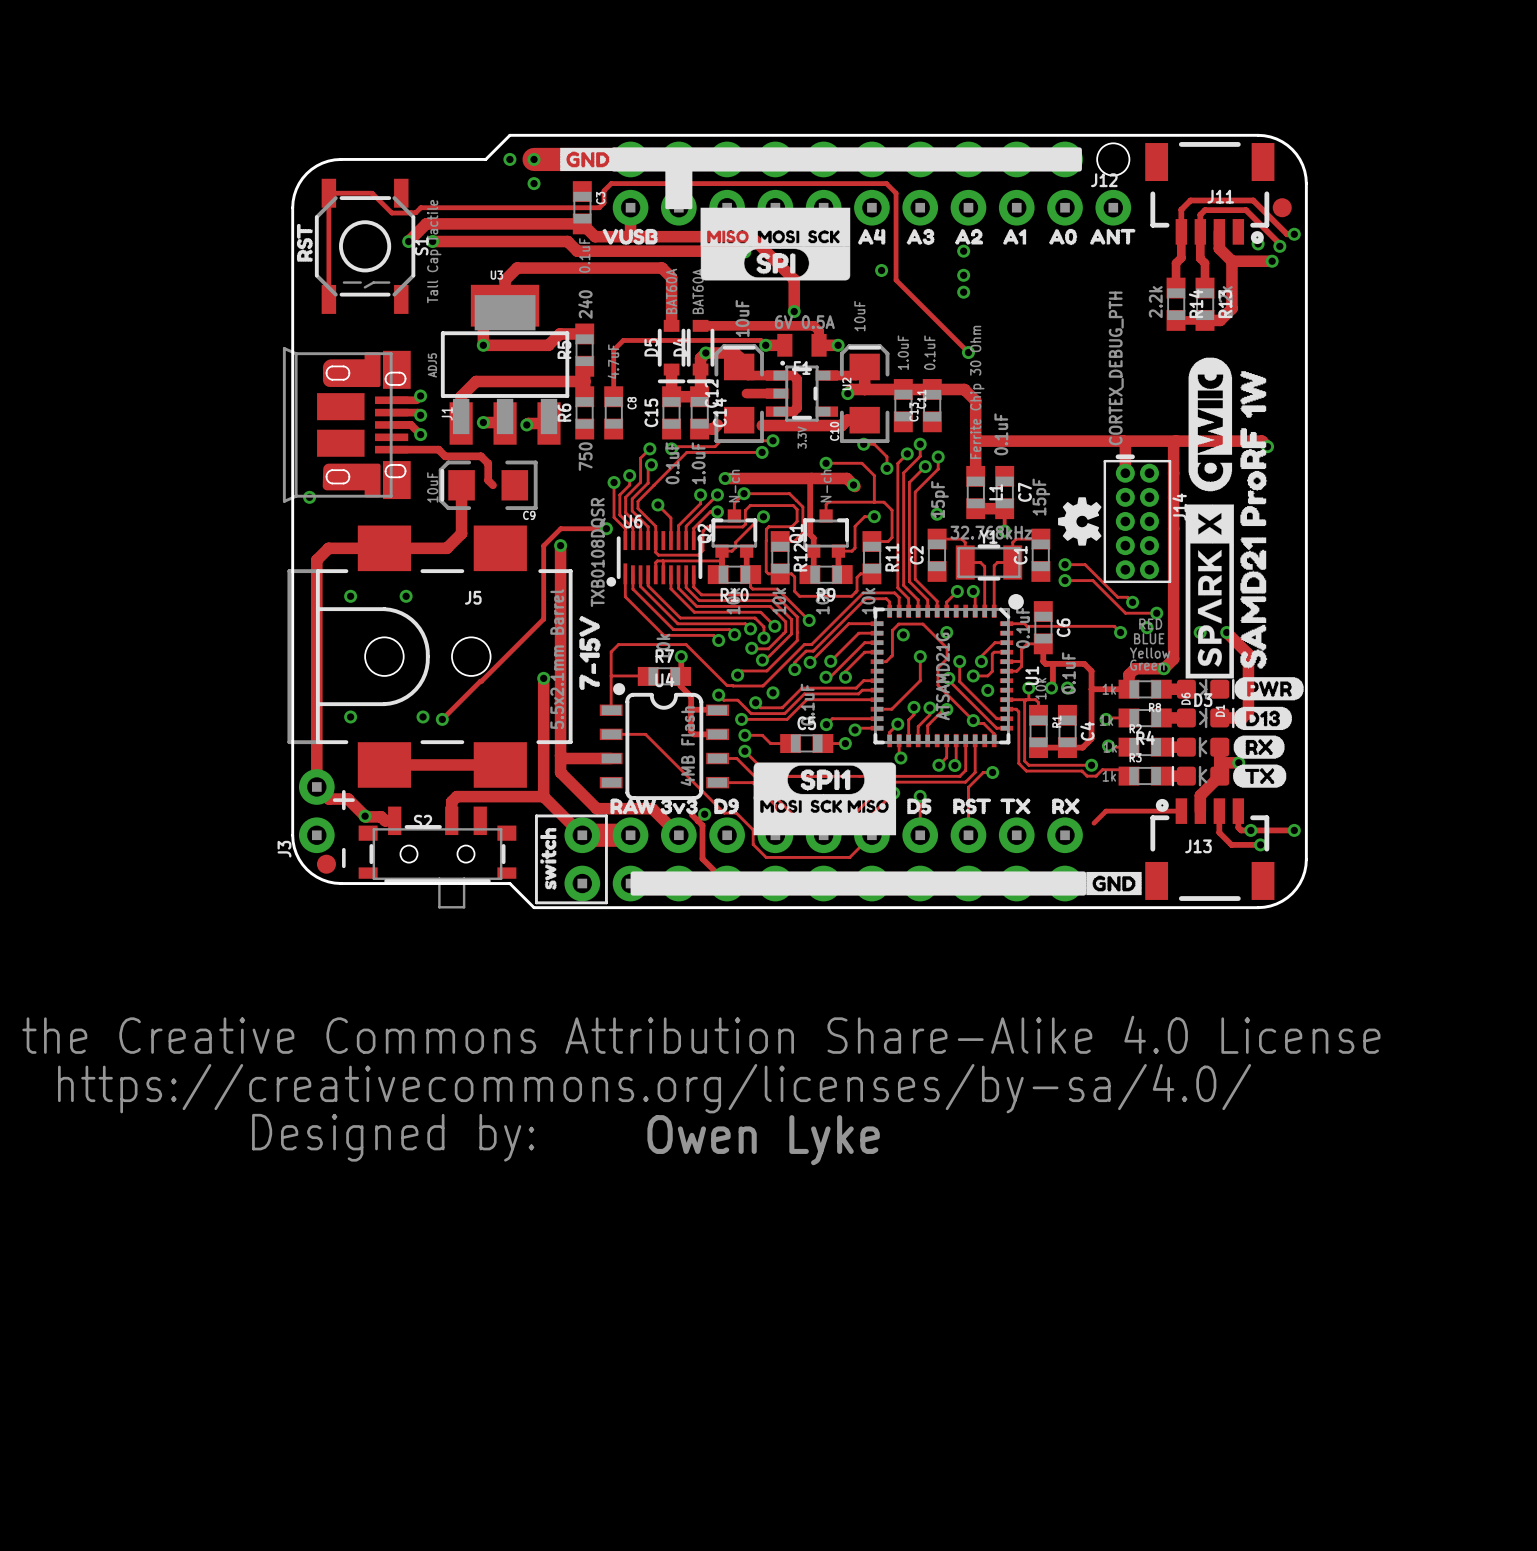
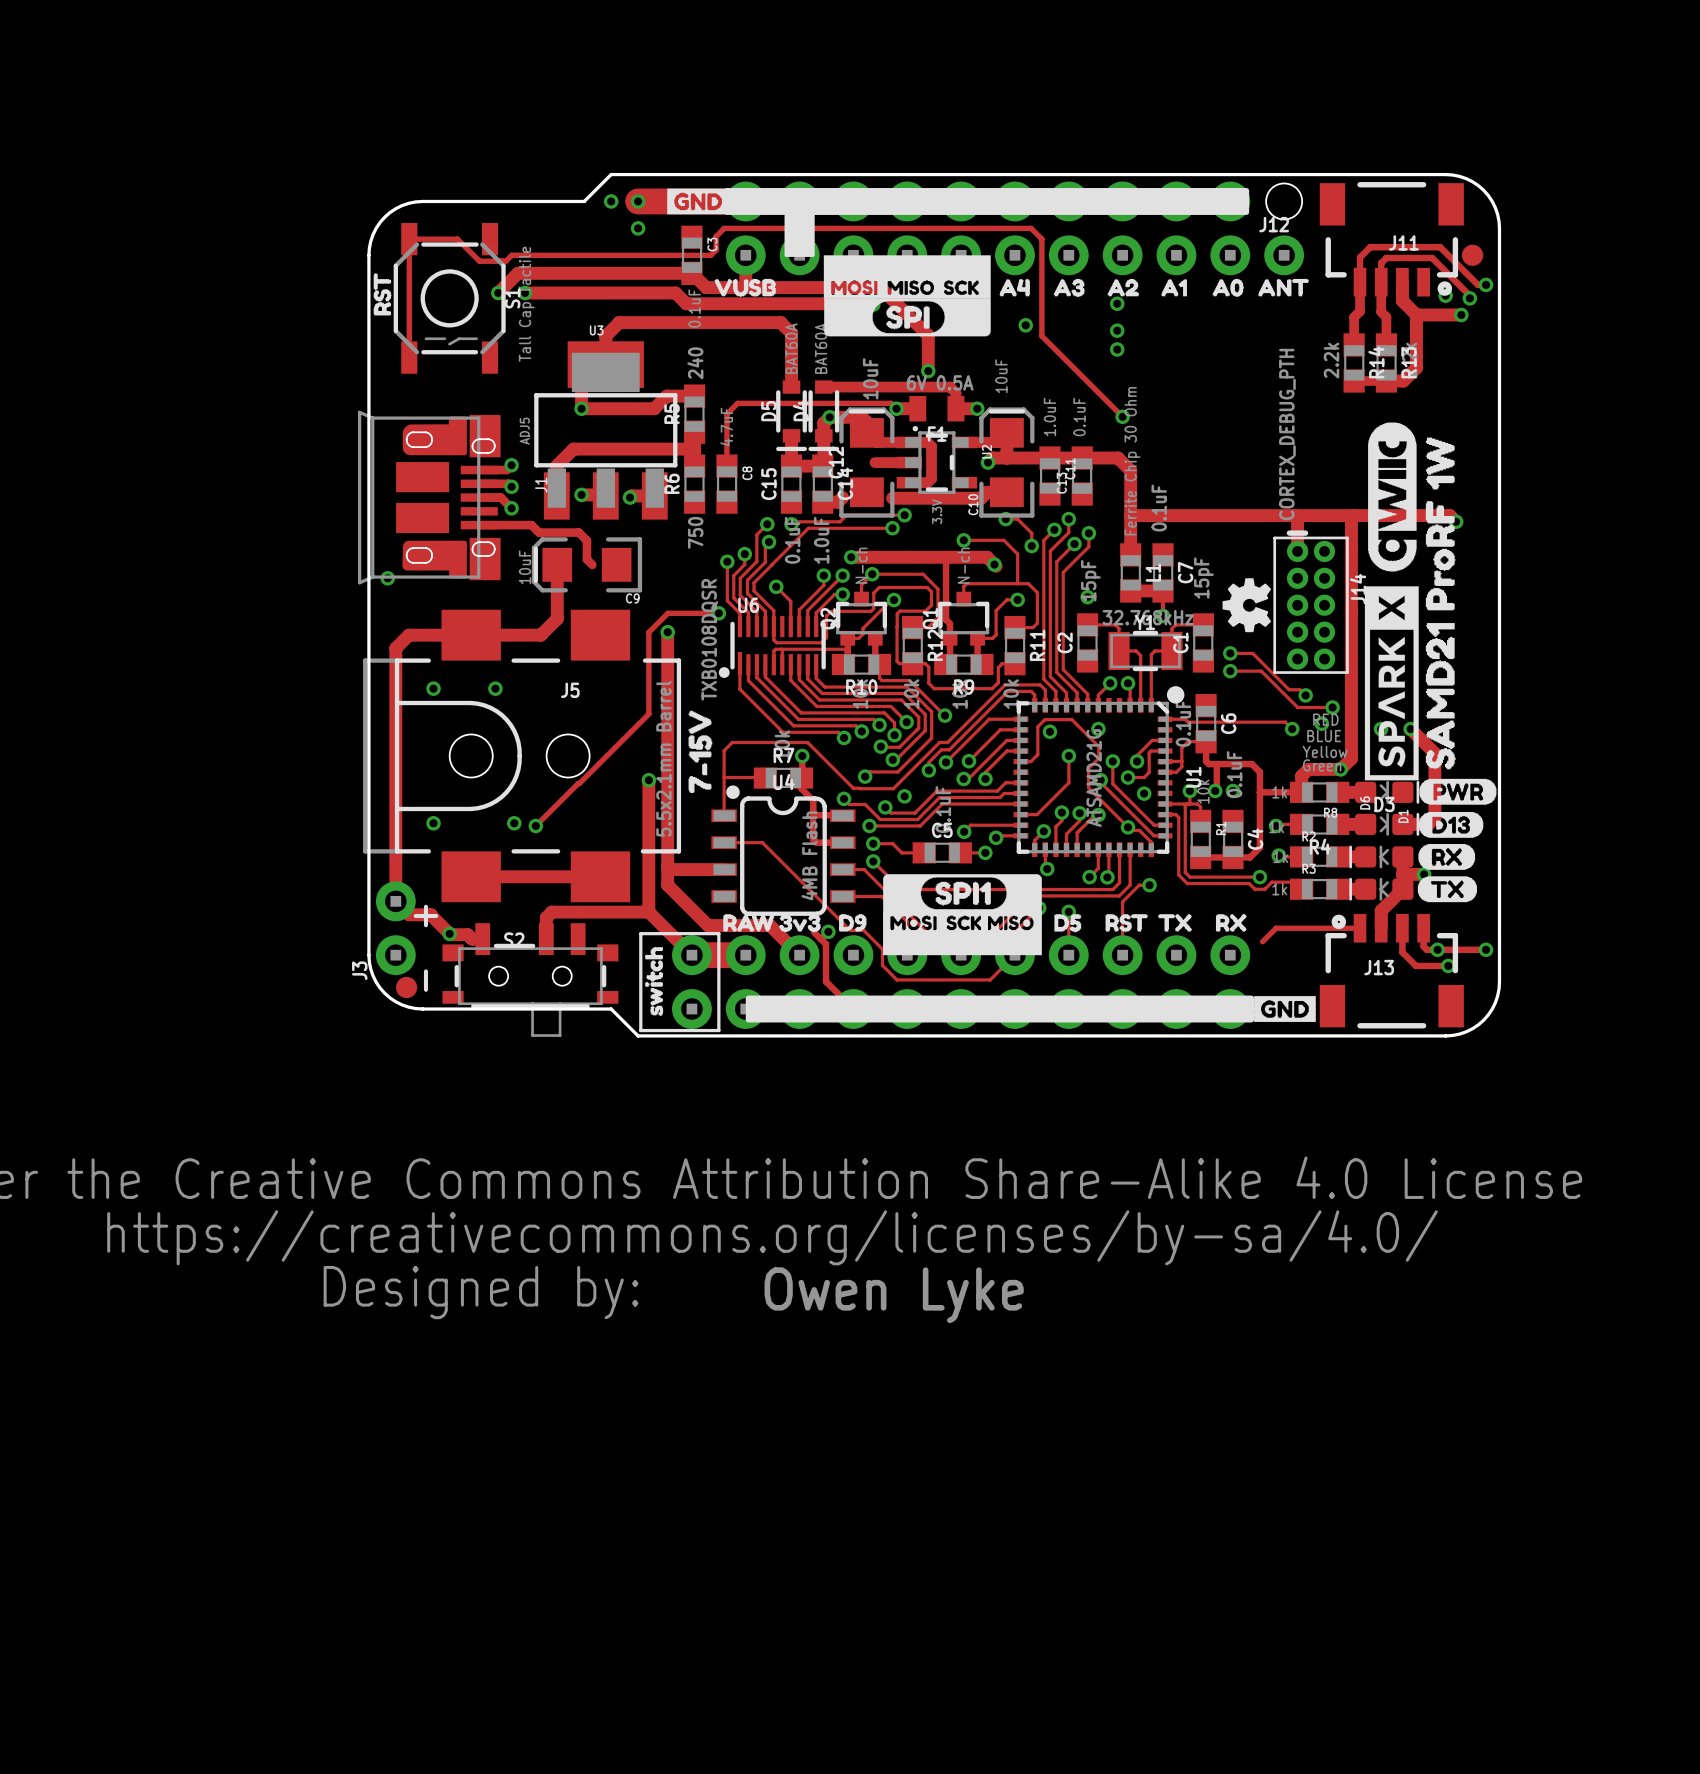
drawing position: (727, 236) -> (910, 287)
drawing position: (778, 236) -> (854, 287)

